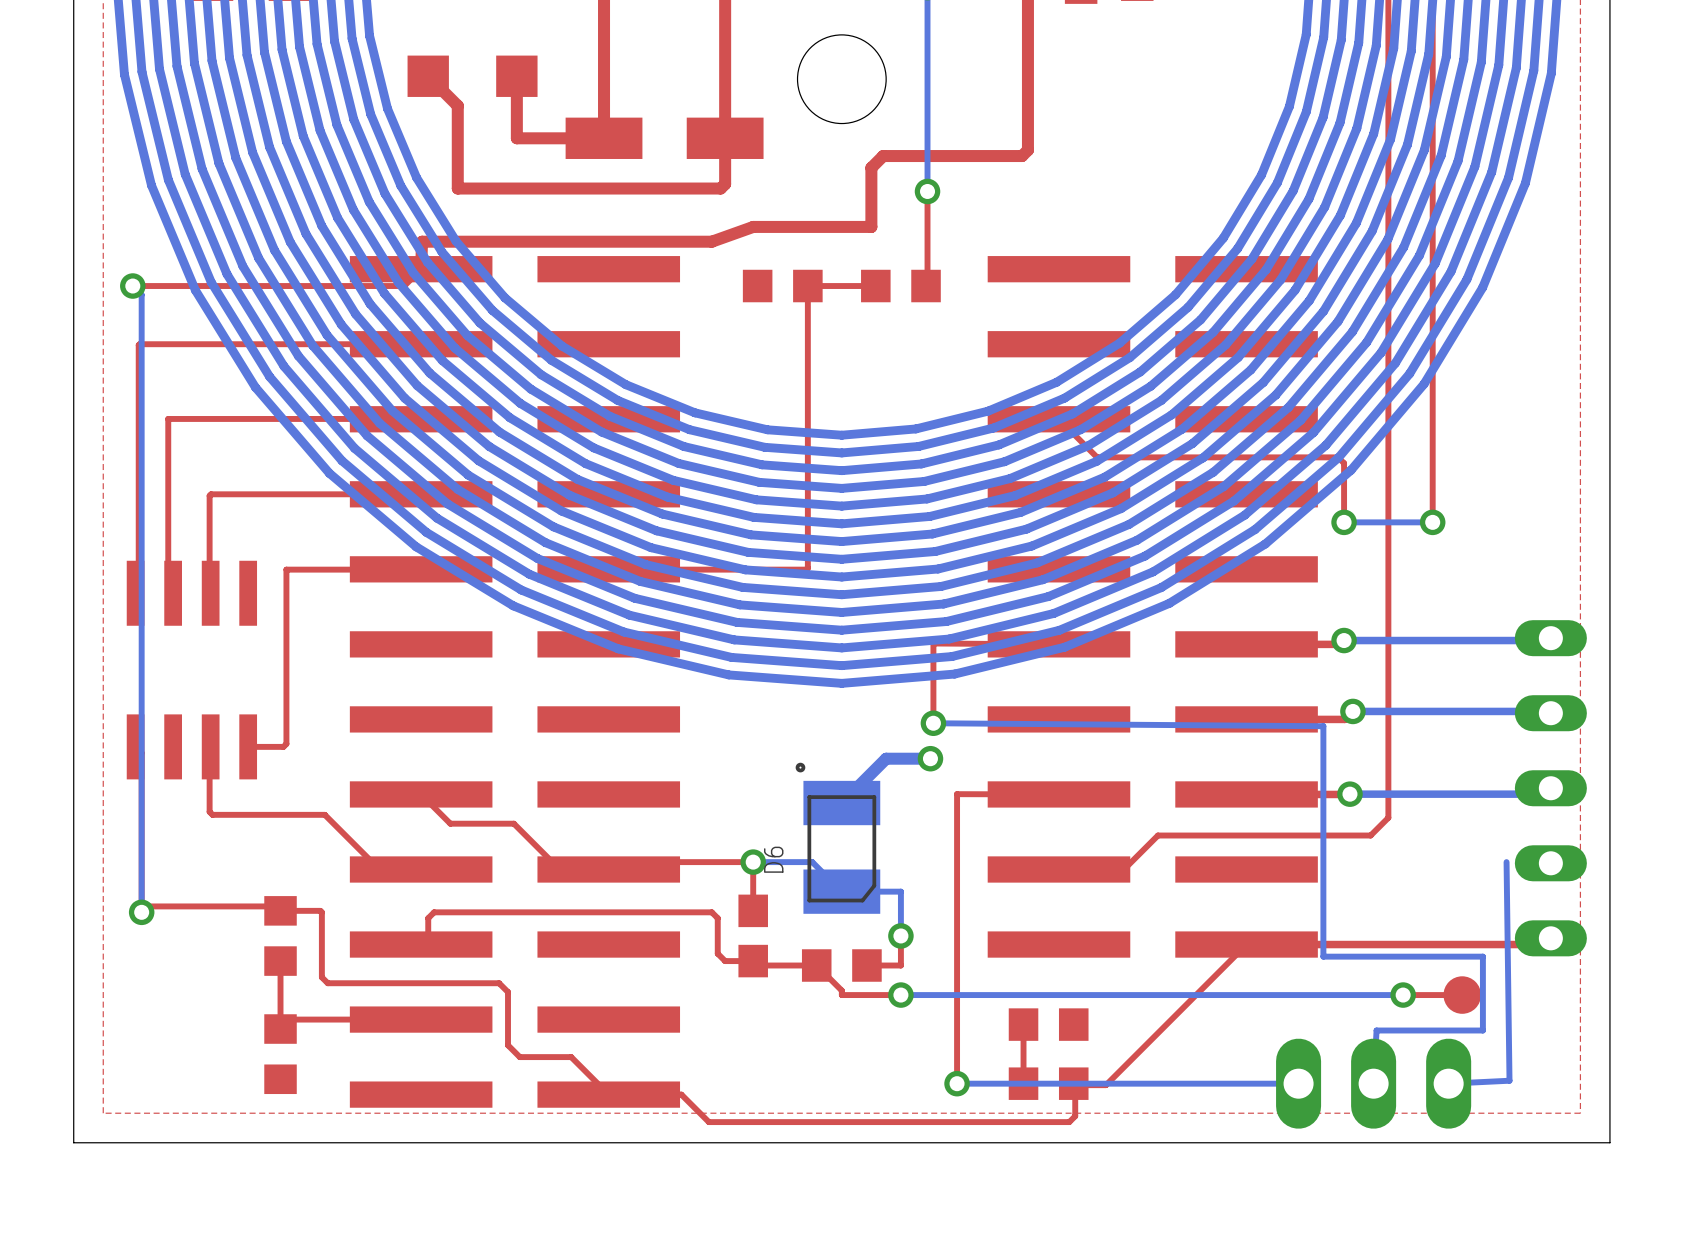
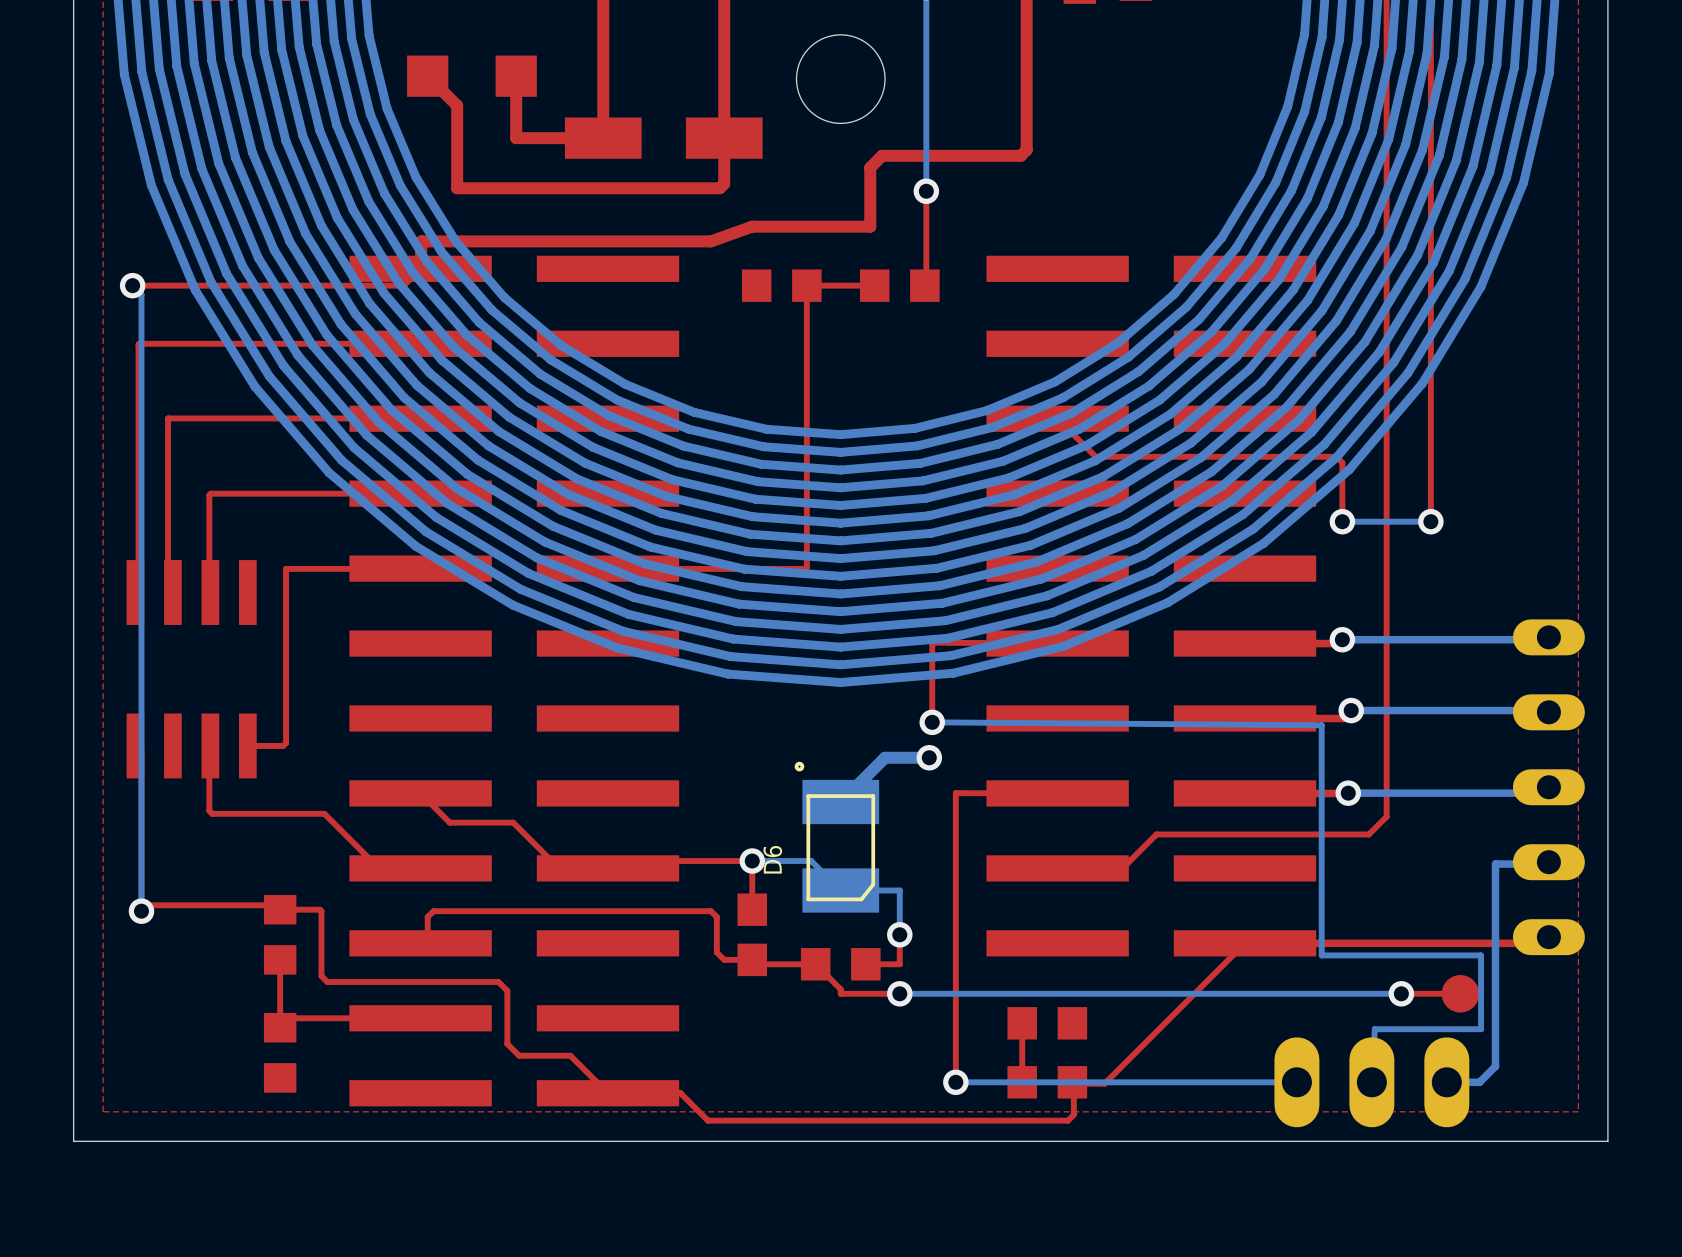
bottom track: (1506, 862) (1509, 1080) (1448, 1083) -> (1548, 862) (1547, 864) (1495, 864) (1495, 1066) (1479, 1082) (1446, 1082)

